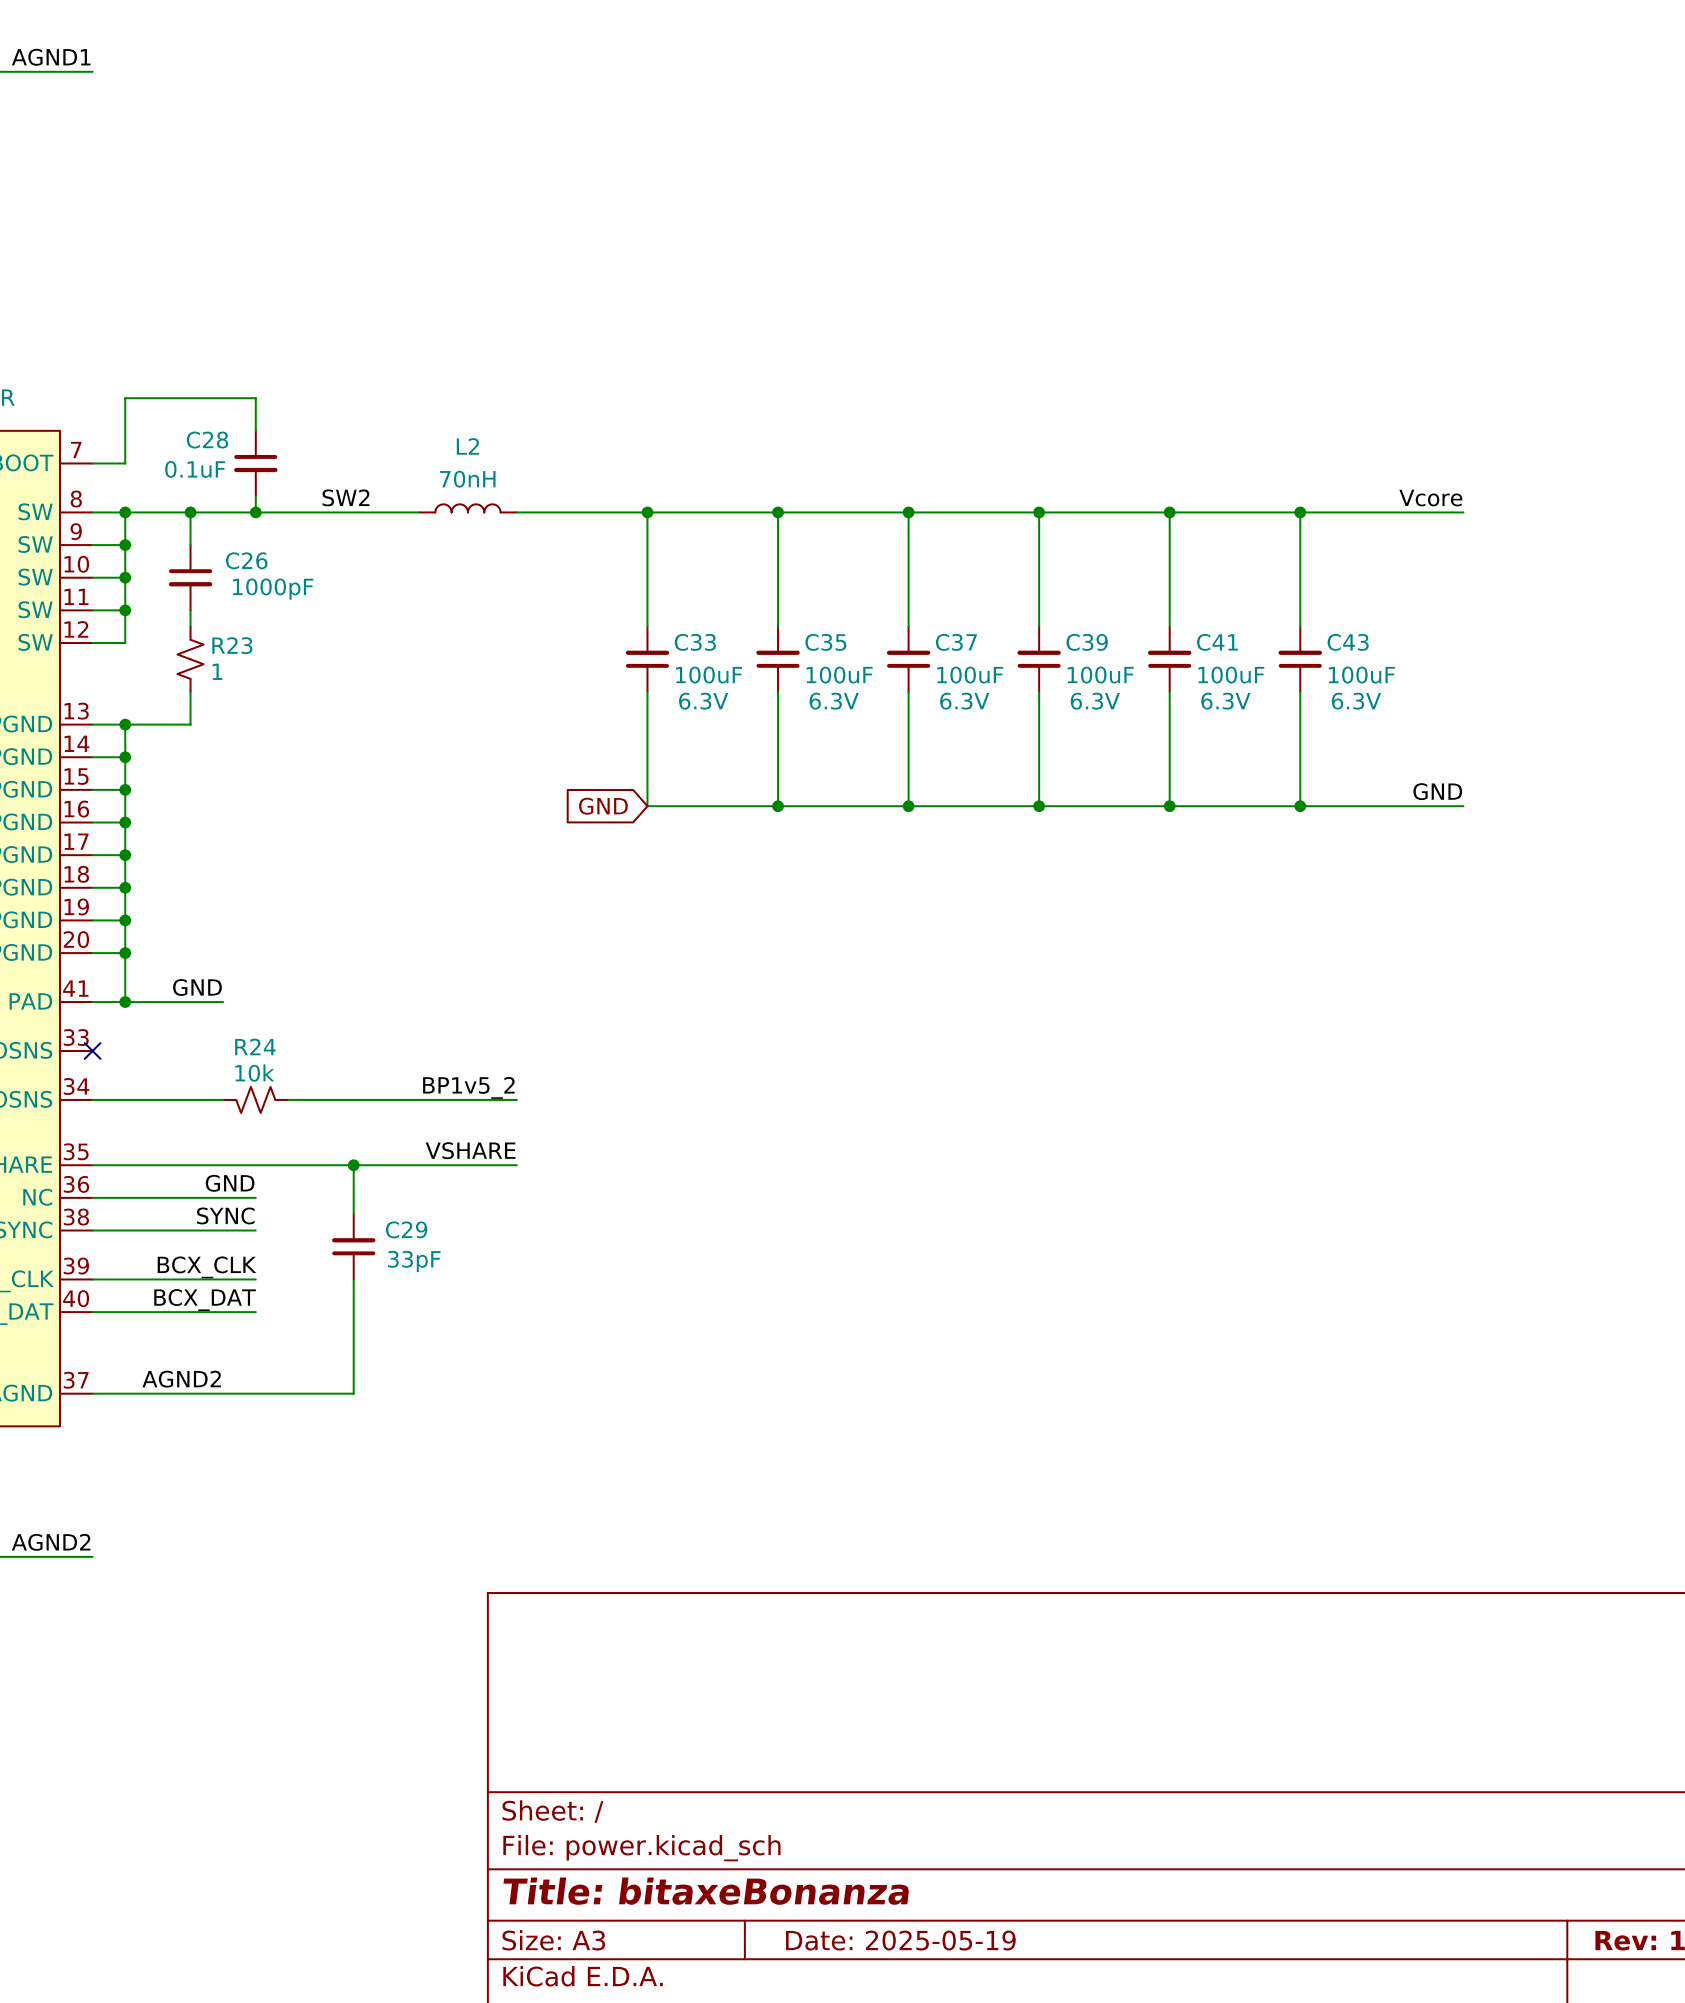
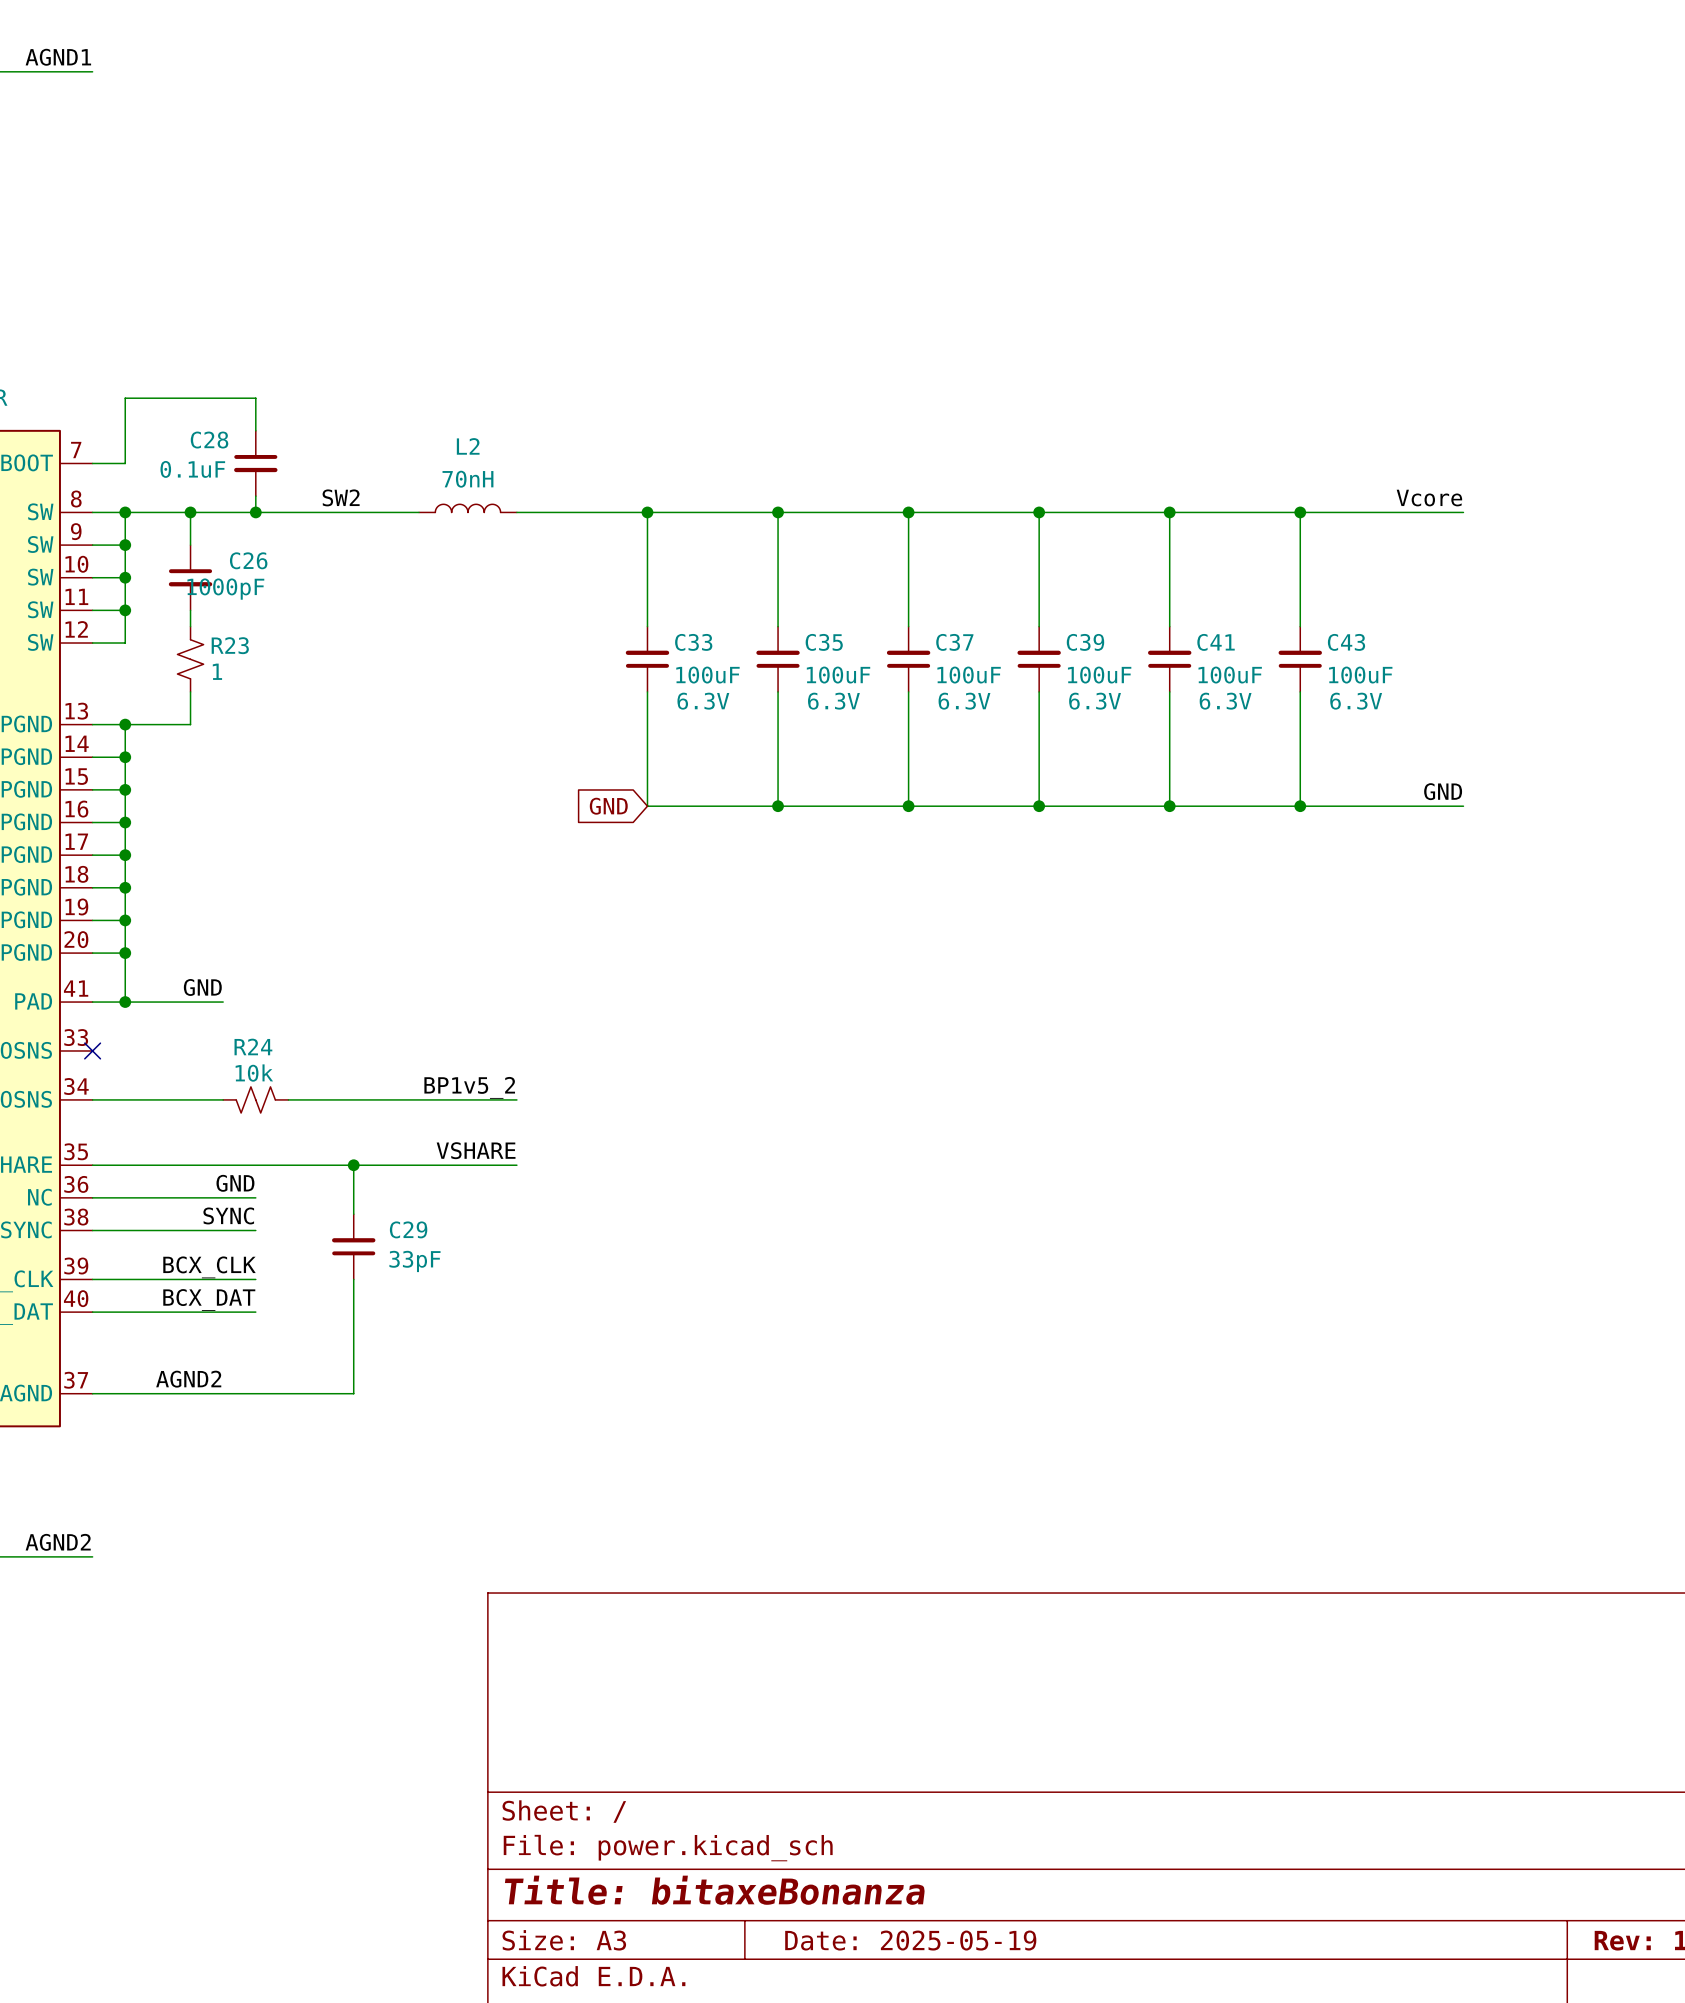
C26 value position: 1000pF (273, 589) -> 1000pF (225, 589)

